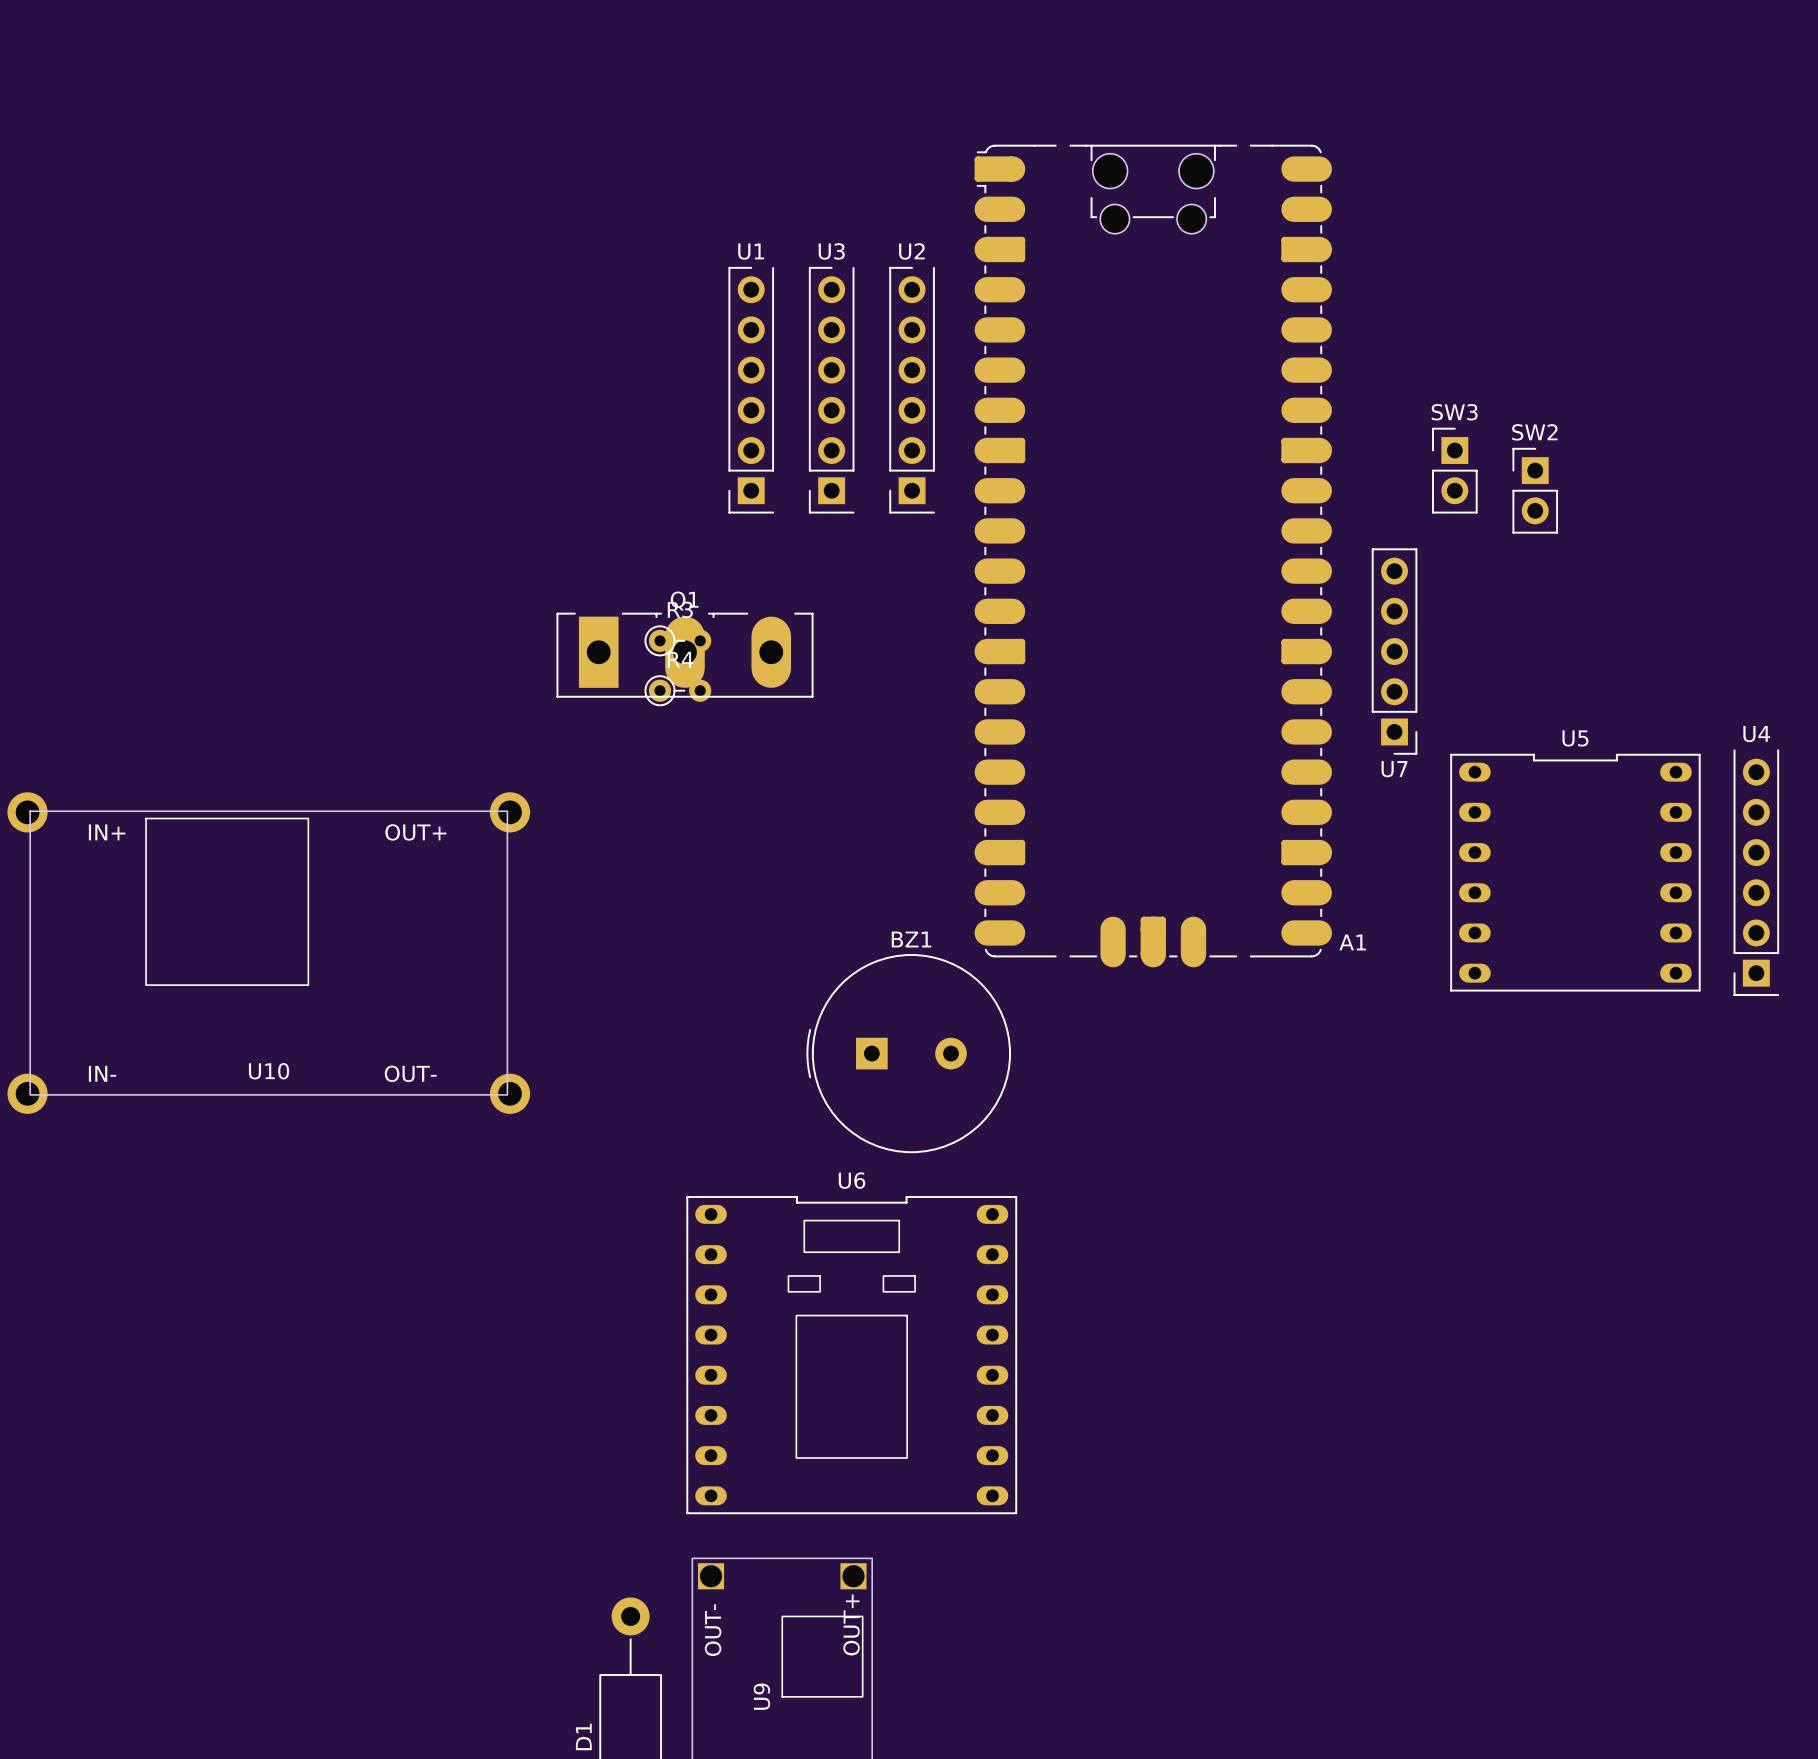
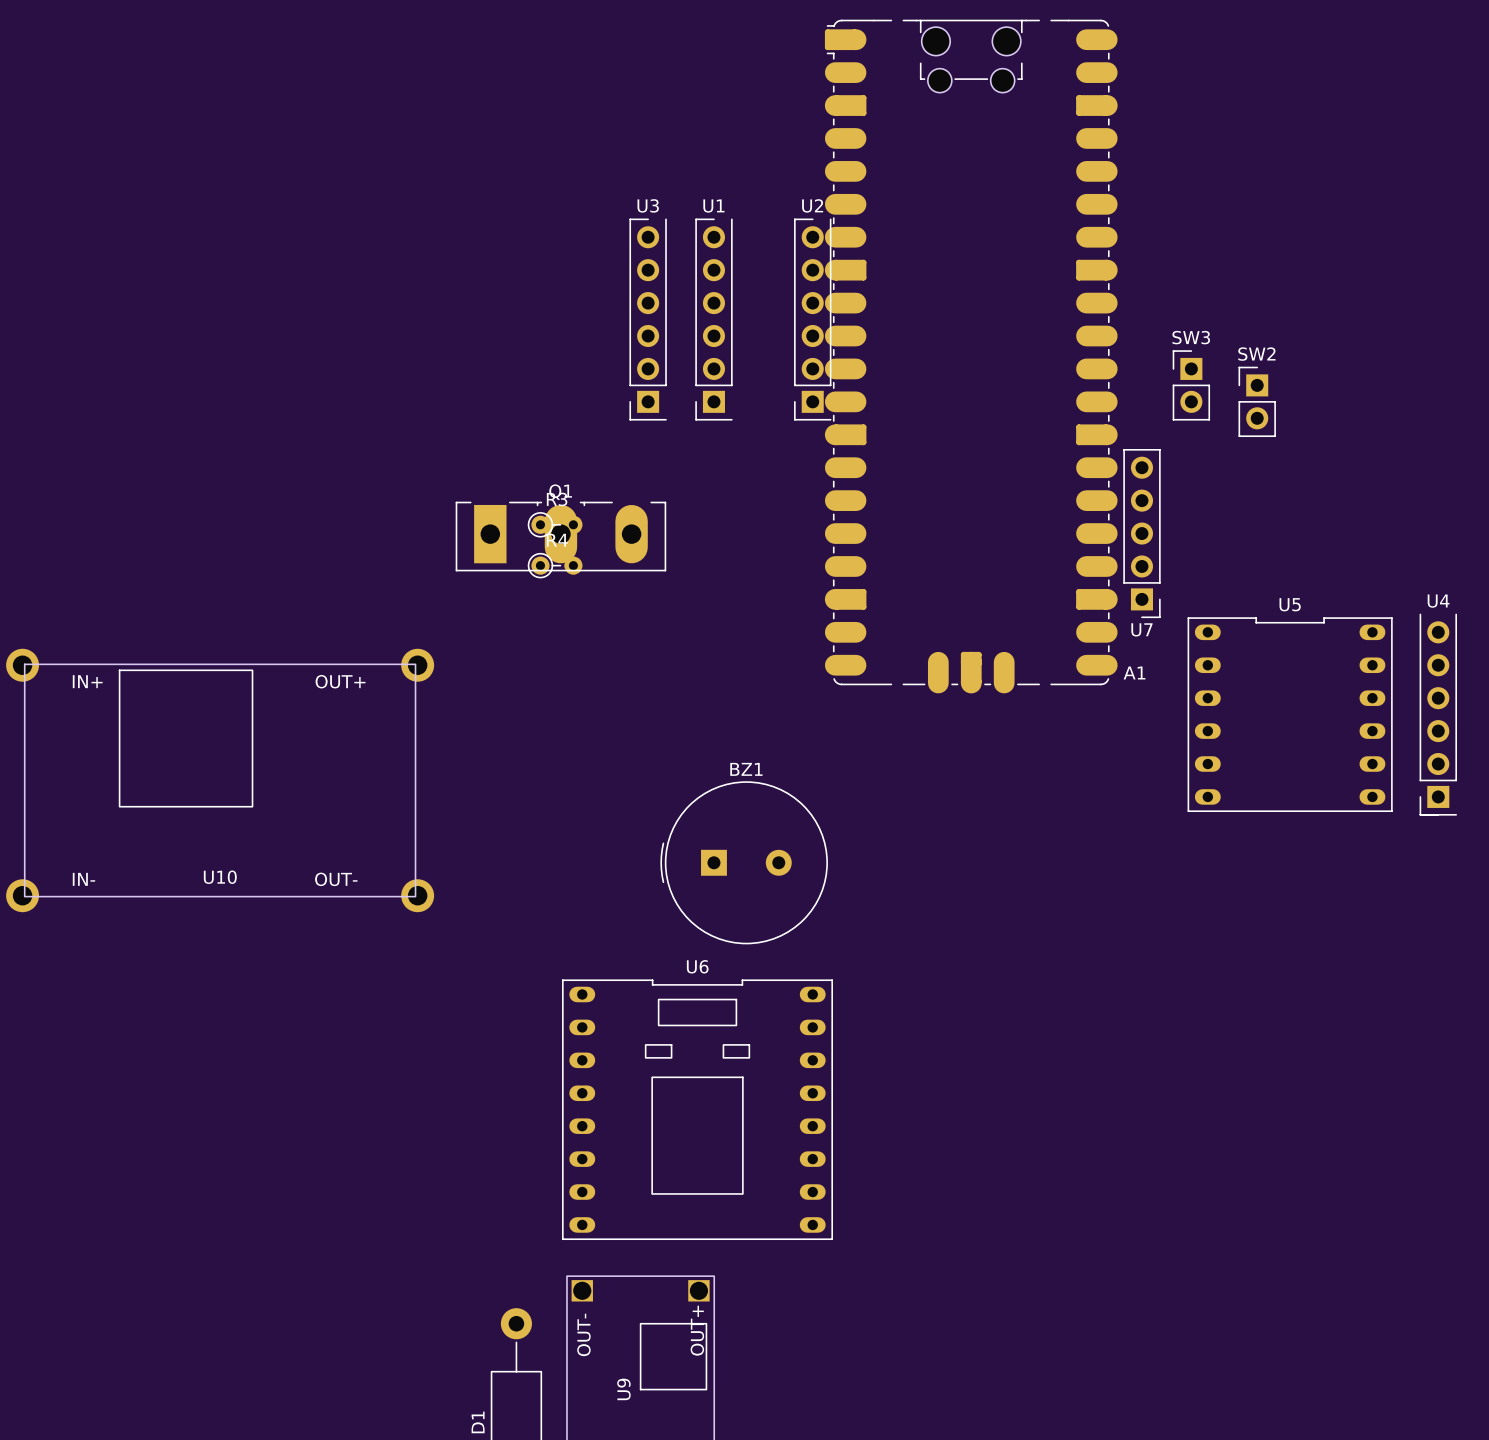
U1 position: (751, 390) -> (713, 319)
U3 position: (831, 390) -> (648, 319)
U2 position: (912, 390) -> (812, 319)
A1 position: (1153, 556) -> (971, 356)

